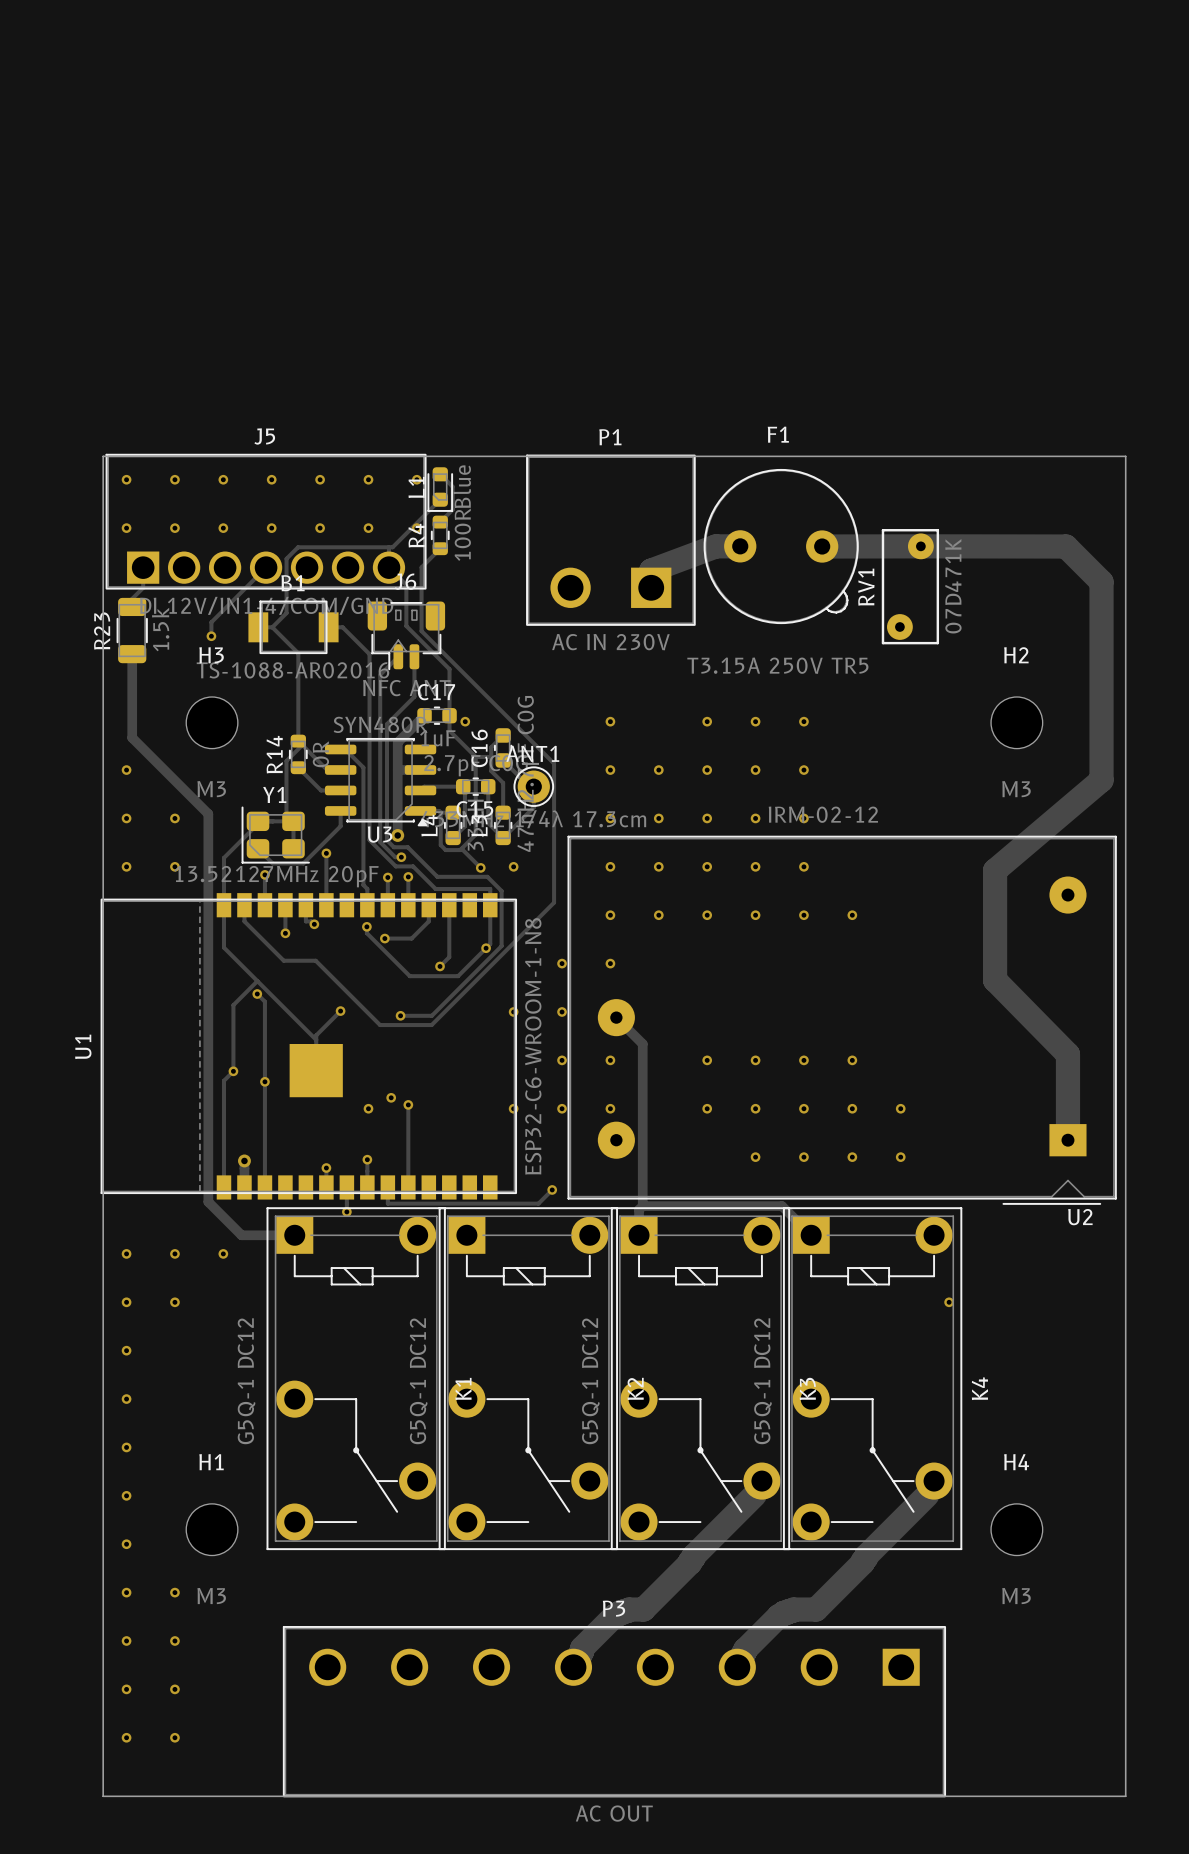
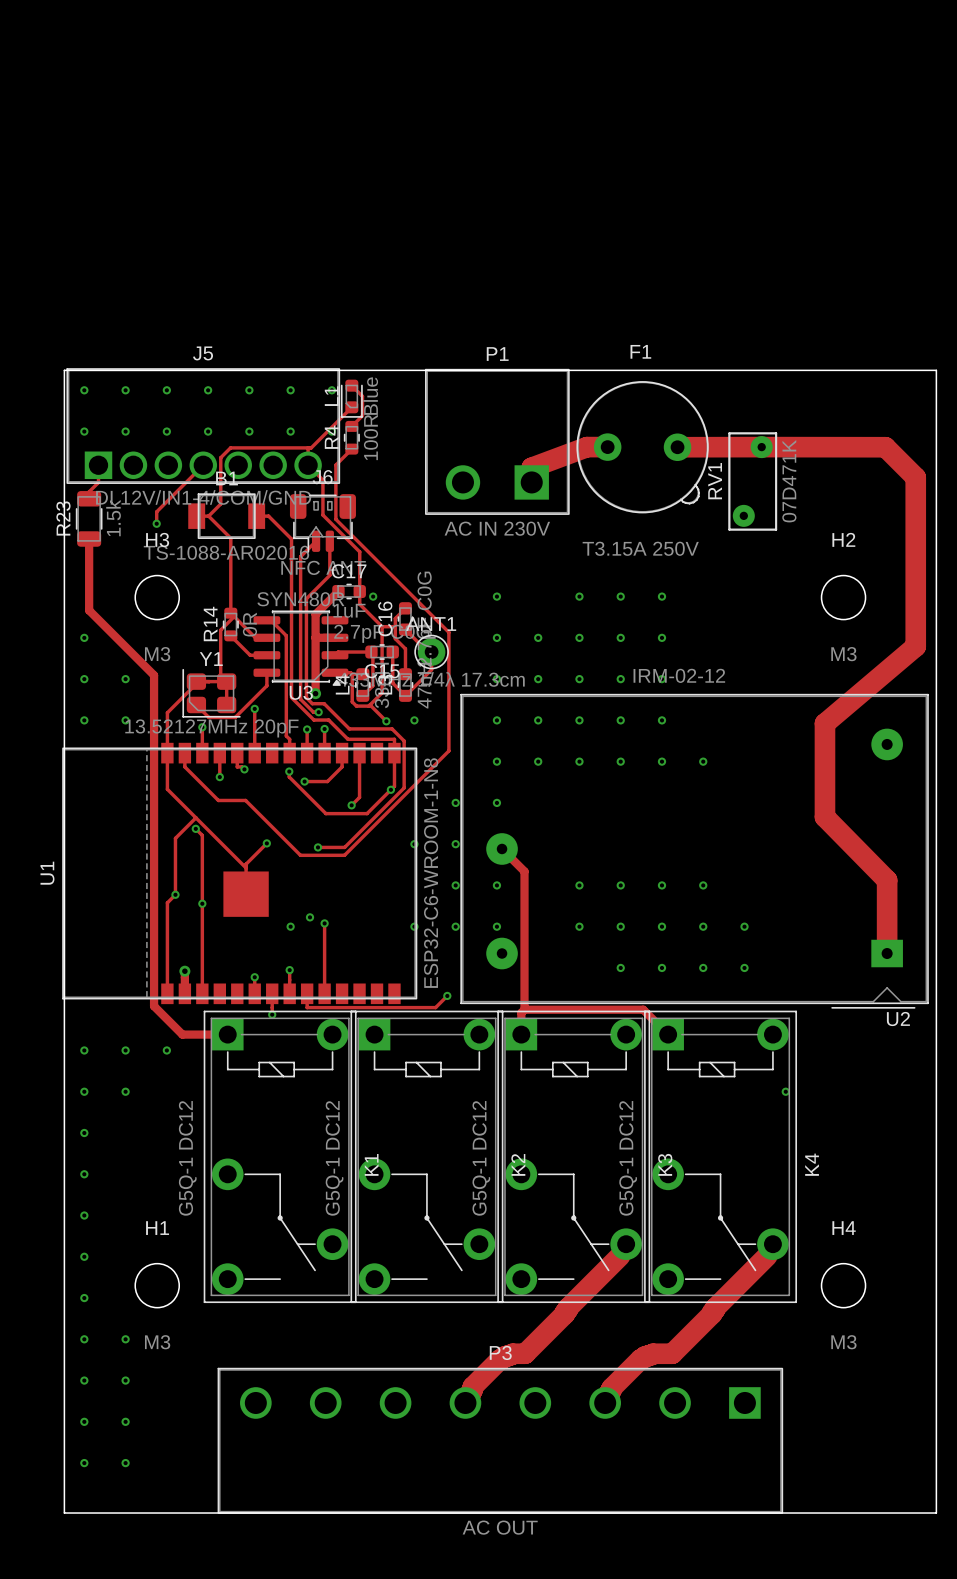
F1 value: T3.15A 250V TR5 (777, 665) -> T3.15A 250V (640, 548)

